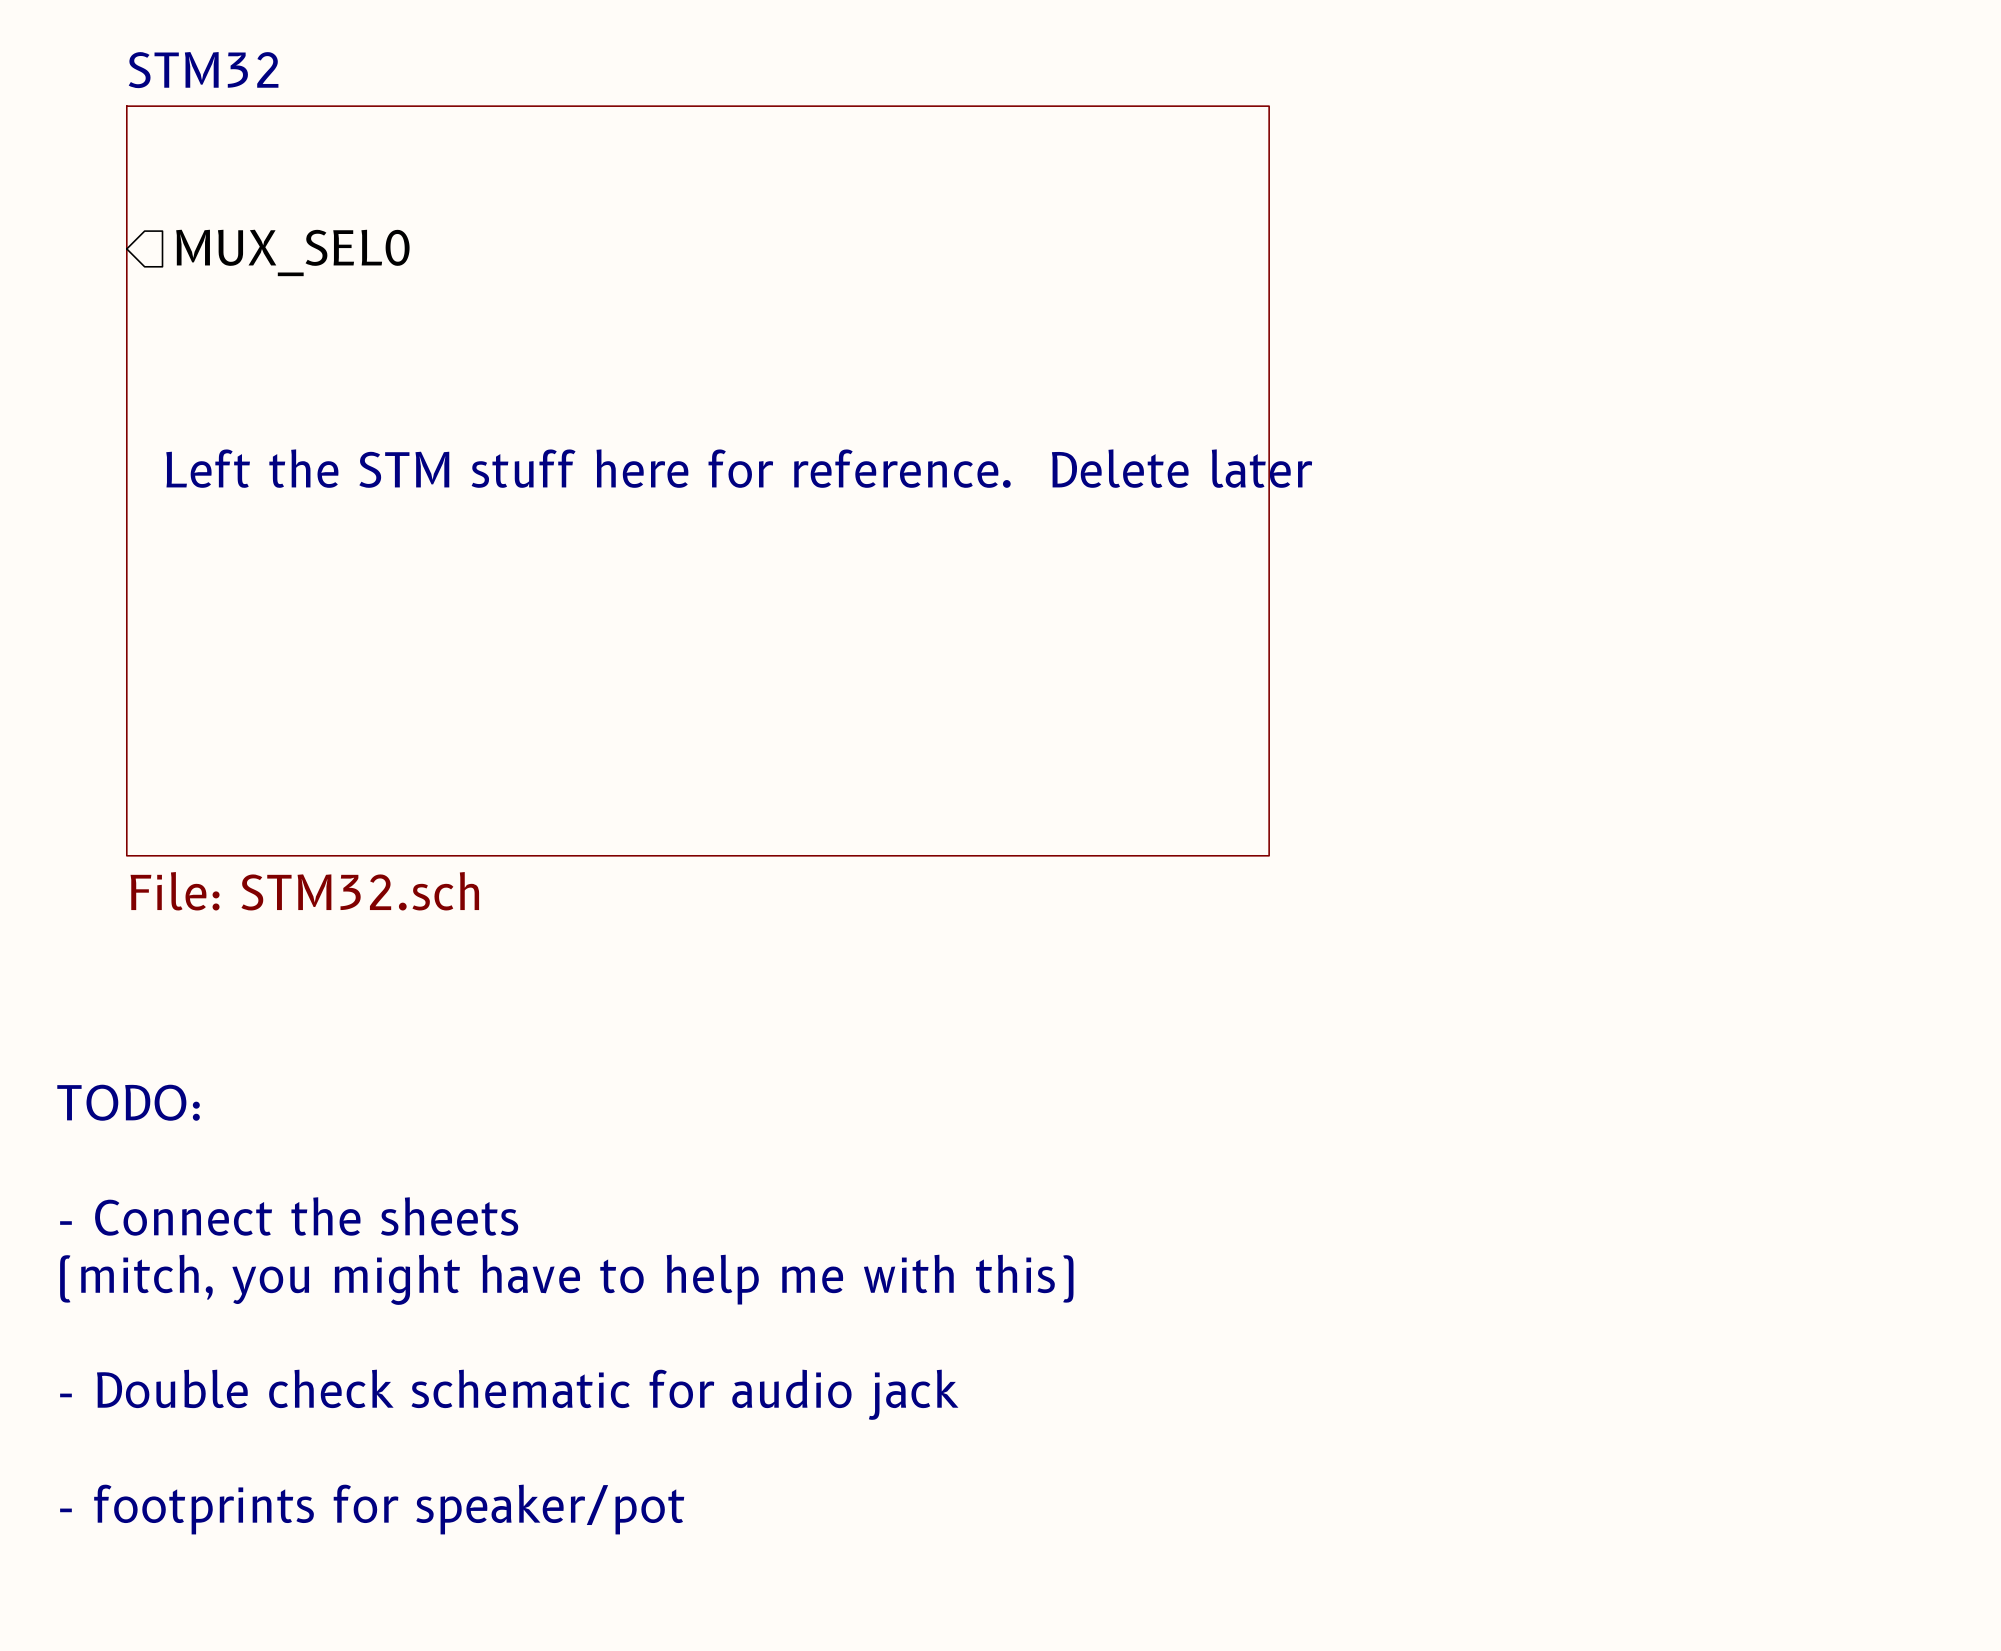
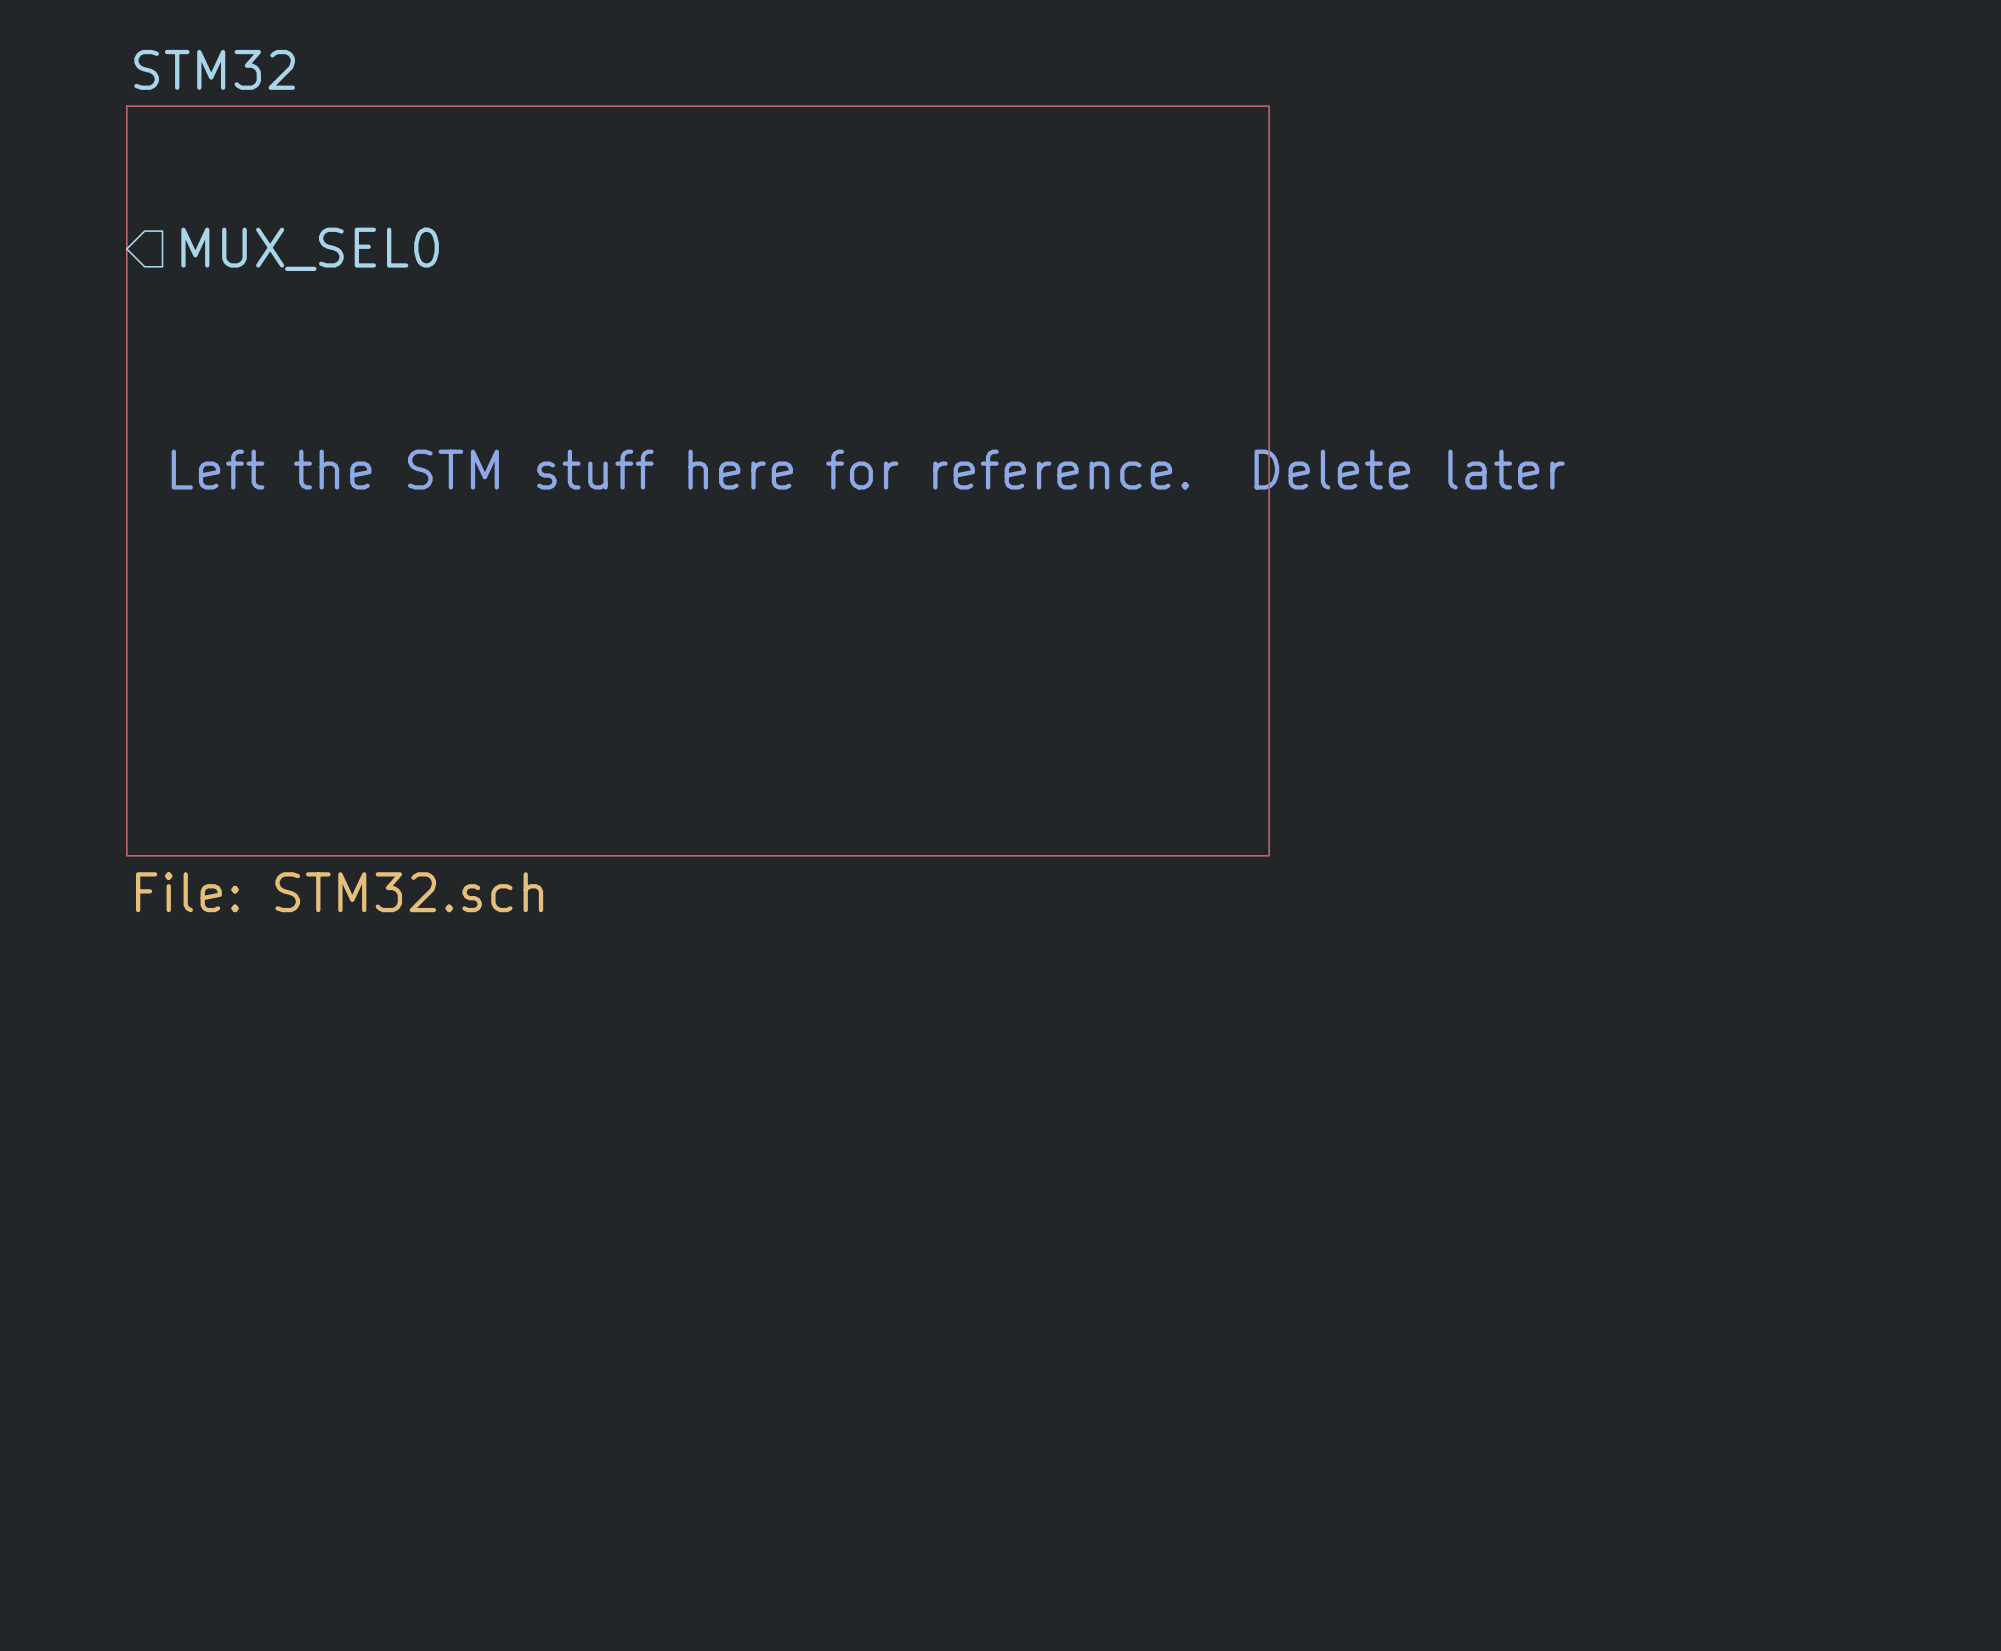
text: TODO: (128, 1102) -> none
text: - Connect the sheets (289, 1216) -> none
text: (mitch, you might have to help me with this) (566, 1279) -> none
text: - Double check schematic for audio jack (509, 1394) -> none
text: - footprints for speaker/pot (372, 1509) -> none

